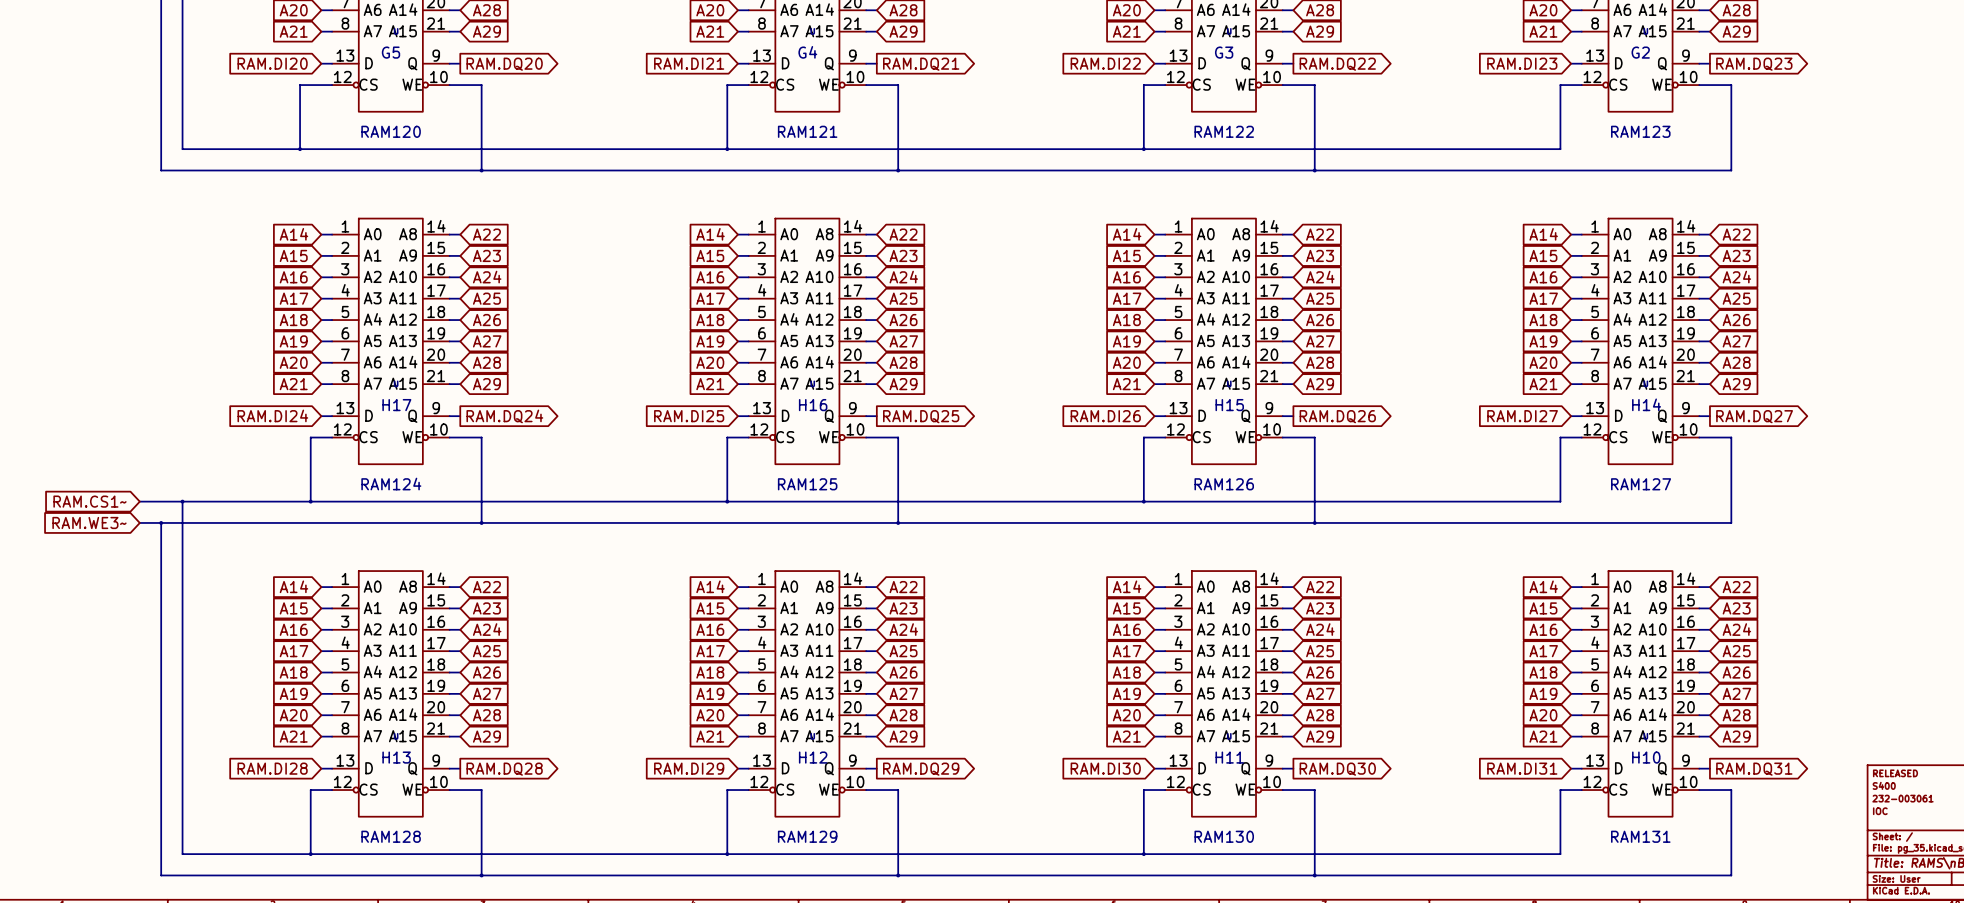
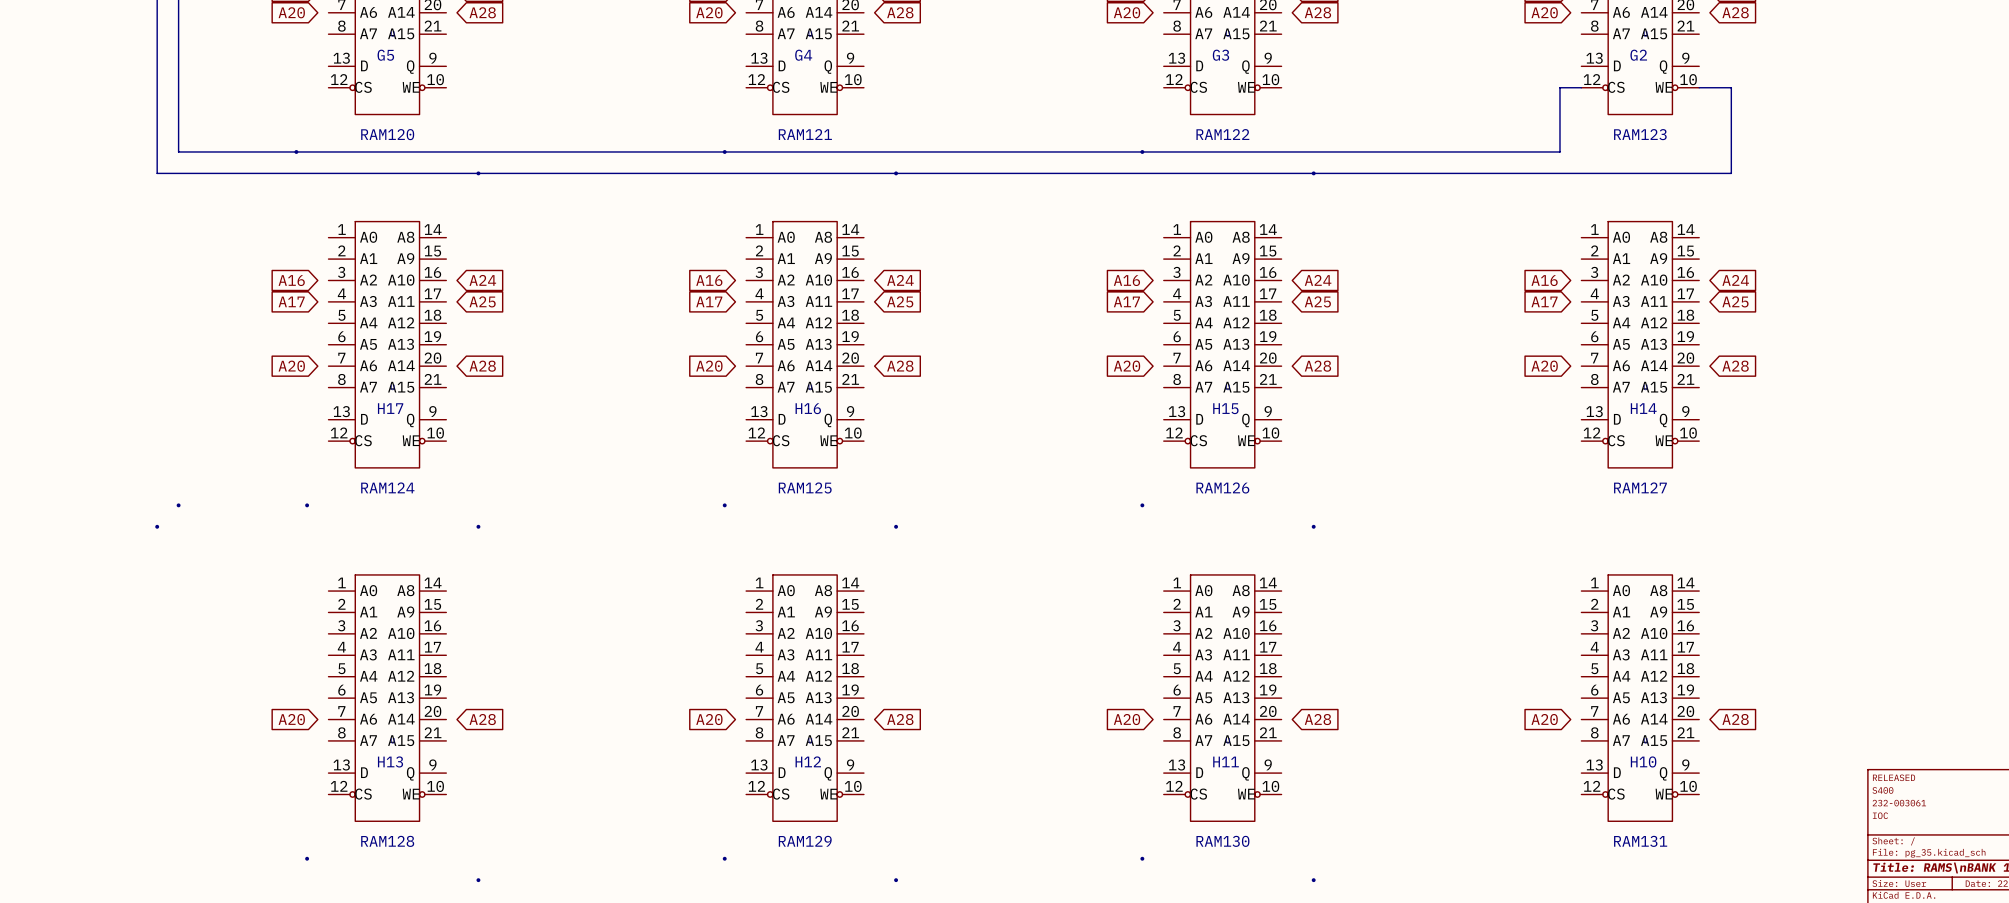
wire: (321, 10) (332, 10) -> none
wire: (449, 10) (460, 10) -> none
wire: (737, 10) (748, 10) -> none
wire: (866, 10) (876, 10) -> none
wire: (1154, 10) (1165, 10) -> none
wire: (1282, 10) (1293, 10) -> none
wire: (1571, 10) (1581, 10) -> none
wire: (1699, 10) (1709, 10) -> none
global label: A21 (293, 31) -> none
wire: (321, 31) (332, 31) -> none
wire: (449, 31) (460, 31) -> none
global label: A29 (486, 31) -> none
global label: A21 (710, 31) -> none
wire: (737, 31) (748, 31) -> none
wire: (866, 31) (876, 31) -> none
global label: A29 (903, 31) -> none
global label: A21 (1126, 31) -> none
wire: (1154, 31) (1165, 31) -> none
wire: (1282, 31) (1293, 31) -> none
global label: A29 (1320, 31) -> none
global label: A21 (1543, 31) -> none
wire: (1571, 31) (1581, 31) -> none
wire: (1699, 31) (1709, 31) -> none
global label: A29 (1736, 31) -> none
global label: RAM.DI20 (272, 63) -> none
wire: (321, 63) (332, 63) -> none
wire: (449, 63) (460, 63) -> none
global label: RAM.DI21 (689, 63) -> none
wire: (737, 63) (748, 63) -> none
wire: (866, 63) (876, 63) -> none
global label: RAM.DI22 (1105, 63) -> none
wire: (1154, 63) (1165, 63) -> none
wire: (1282, 63) (1293, 63) -> none
global label: RAM.DI23 (1522, 63) -> none
wire: (1571, 63) (1581, 63) -> none
wire: (1699, 63) (1709, 63) -> none
global label: RAM.DQ20 (504, 64) -> none
global label: RAM.DQ21 (921, 64) -> none
global label: RAM.DQ22 (1337, 64) -> none
global label: RAM.DQ23 (1754, 64) -> none
wire: (332, 85) (300, 85) (300, 149) -> none
wire: (449, 85) (481, 85) (481, 170) -> none
wire: (748, 85) (727, 85) (727, 149) -> none
wire: (866, 85) (898, 85) (898, 170) -> none
wire: (1165, 85) (1143, 85) (1143, 149) -> none
wire: (1282, 85) (1314, 85) (1314, 170) -> none
global label: A14 (293, 234) -> none
wire: (321, 234) (332, 234) -> none
wire: (449, 234) (460, 234) -> none
global label: A22 (486, 234) -> none
global label: A14 (710, 234) -> none
wire: (737, 234) (748, 234) -> none
wire: (866, 234) (876, 234) -> none
global label: A22 (903, 234) -> none
global label: A14 (1127, 234) -> none
wire: (1154, 234) (1165, 234) -> none
wire: (1282, 234) (1293, 234) -> none
global label: A22 (1320, 234) -> none
global label: A14 (1543, 234) -> none
wire: (1571, 234) (1581, 234) -> none
wire: (1699, 234) (1709, 234) -> none
global label: A22 (1736, 234) -> none
global label: A15 (293, 255) -> none
wire: (321, 255) (332, 255) -> none
wire: (449, 255) (460, 255) -> none
global label: A23 (486, 255) -> none
global label: A15 (710, 255) -> none
wire: (737, 255) (748, 255) -> none
wire: (866, 255) (876, 255) -> none
global label: A23 (903, 255) -> none
global label: A15 (1126, 255) -> none
wire: (1154, 255) (1165, 255) -> none
wire: (1282, 255) (1293, 255) -> none
global label: A23 (1320, 255) -> none
global label: A15 (1543, 255) -> none
wire: (1571, 255) (1581, 255) -> none
wire: (1699, 255) (1709, 255) -> none
global label: A23 (1736, 255) -> none
wire: (321, 277) (332, 277) -> none
wire: (449, 277) (460, 277) -> none
wire: (737, 277) (748, 277) -> none
wire: (866, 277) (876, 277) -> none
wire: (1154, 277) (1165, 277) -> none
wire: (1282, 277) (1293, 277) -> none
wire: (1571, 277) (1581, 277) -> none
wire: (1699, 277) (1709, 277) -> none
wire: (321, 298) (332, 298) -> none
wire: (449, 298) (460, 298) -> none
wire: (737, 298) (748, 298) -> none
wire: (866, 298) (876, 298) -> none
wire: (1154, 298) (1165, 298) -> none
wire: (1282, 298) (1293, 298) -> none
wire: (1571, 298) (1581, 298) -> none
wire: (1699, 298) (1709, 298) -> none
global label: A18 (293, 320) -> none
wire: (321, 320) (332, 320) -> none
wire: (449, 320) (460, 320) -> none
global label: A26 (486, 320) -> none
global label: A18 (710, 320) -> none
wire: (737, 320) (748, 320) -> none
wire: (866, 320) (876, 320) -> none
global label: A26 (903, 320) -> none
global label: A18 (1126, 320) -> none
wire: (1154, 320) (1165, 320) -> none
wire: (1282, 320) (1293, 320) -> none
global label: A26 (1320, 320) -> none
global label: A18 (1543, 320) -> none
wire: (1571, 320) (1581, 320) -> none
wire: (1699, 320) (1709, 320) -> none
global label: A26 (1736, 320) -> none
global label: A19 (293, 341) -> none
wire: (321, 341) (332, 341) -> none
wire: (449, 341) (460, 341) -> none
global label: A27 (487, 341) -> none
global label: A19 (710, 341) -> none
wire: (737, 341) (748, 341) -> none
wire: (866, 341) (876, 341) -> none
global label: A27 (903, 341) -> none
global label: A19 (1126, 341) -> none
wire: (1154, 341) (1165, 341) -> none
wire: (1282, 341) (1293, 341) -> none
global label: A27 (1320, 341) -> none
global label: A19 (1543, 341) -> none
wire: (1571, 341) (1581, 341) -> none
wire: (1699, 341) (1709, 341) -> none
global label: A27 (1736, 341) -> none
wire: (321, 362) (332, 362) -> none
wire: (449, 362) (460, 362) -> none
wire: (737, 362) (748, 362) -> none
wire: (866, 362) (876, 362) -> none
wire: (1154, 362) (1165, 362) -> none
wire: (1282, 362) (1293, 362) -> none
wire: (1571, 362) (1581, 362) -> none
wire: (1699, 362) (1709, 362) -> none
global label: A21 (293, 384) -> none
wire: (321, 384) (332, 384) -> none
wire: (449, 384) (460, 384) -> none
global label: A29 (486, 384) -> none
global label: A21 (710, 384) -> none
wire: (737, 384) (748, 384) -> none
wire: (866, 384) (876, 384) -> none
global label: A29 (903, 384) -> none
global label: A21 (1126, 384) -> none
wire: (1154, 384) (1165, 384) -> none
wire: (1282, 384) (1293, 384) -> none
global label: A29 (1320, 384) -> none
global label: A21 (1543, 384) -> none
wire: (1571, 384) (1581, 384) -> none
wire: (1699, 384) (1709, 384) -> none
global label: A29 (1736, 384) -> none
global label: RAM.DI24 (272, 415) -> none
wire: (321, 416) (332, 416) -> none
wire: (449, 416) (460, 416) -> none
global label: RAM.DQ24 (504, 416) -> none
global label: RAM.DI25 (689, 416) -> none
wire: (737, 416) (748, 416) -> none
wire: (866, 416) (876, 416) -> none
global label: RAM.DQ25 (921, 416) -> none
global label: RAM.DI26 (1105, 416) -> none
wire: (1154, 416) (1165, 416) -> none
wire: (1282, 416) (1293, 416) -> none
global label: RAM.DQ26 (1337, 416) -> none
global label: RAM.DI27 (1522, 416) -> none
wire: (1571, 416) (1581, 416) -> none
wire: (1699, 416) (1709, 416) -> none
global label: RAM.DQ27 (1754, 416) -> none
wire: (332, 437) (310, 437) (310, 501) -> none
wire: (449, 437) (481, 437) (481, 522) -> none
wire: (748, 437) (727, 437) (727, 501) -> none
wire: (866, 437) (898, 437) (898, 522) -> none
wire: (1165, 437) (1143, 437) (1143, 501) -> none
wire: (1282, 437) (1314, 437) (1314, 522) -> none
wire: (1581, 437) (1560, 437) (1560, 501) (139, 501) -> none
wire: (1699, 437) (1731, 437) (1731, 522) (139, 522) -> none
global label: RAM.CS1~ (89, 501) -> none
wire: (182, 501) (182, 854) (1560, 854) (1560, 790) (1581, 790) -> none
global label: RAM.WE3~ (89, 522) -> none
wire: (161, 522) (161, 875) (1731, 875) (1731, 790) (1699, 790) -> none
global label: A14 (293, 586) -> none
global label: A14 (710, 586) -> none
global label: A14 (1127, 586) -> none
global label: A14 (1543, 586) -> none
wire: (321, 587) (332, 587) -> none
wire: (449, 587) (460, 587) -> none
global label: A22 (486, 587) -> none
wire: (737, 587) (748, 587) -> none
wire: (866, 587) (876, 587) -> none
global label: A22 (903, 587) -> none
wire: (1154, 587) (1165, 587) -> none
wire: (1282, 587) (1293, 587) -> none
global label: A22 (1320, 587) -> none
wire: (1571, 587) (1581, 587) -> none
wire: (1699, 587) (1709, 587) -> none
global label: A22 (1736, 587) -> none
global label: A15 (293, 608) -> none
wire: (321, 608) (332, 608) -> none
wire: (449, 608) (460, 608) -> none
global label: A23 (486, 608) -> none
global label: A15 (710, 608) -> none
wire: (737, 608) (748, 608) -> none
wire: (866, 608) (876, 608) -> none
global label: A23 (903, 608) -> none
global label: A15 (1126, 608) -> none
wire: (1154, 608) (1165, 608) -> none
wire: (1282, 608) (1293, 608) -> none
global label: A23 (1320, 608) -> none
global label: A15 (1543, 608) -> none
wire: (1571, 608) (1581, 608) -> none
wire: (1699, 608) (1709, 608) -> none
global label: A23 (1736, 608) -> none
global label: A16 (293, 629) -> none
wire: (321, 629) (332, 629) -> none
wire: (449, 629) (460, 629) -> none
global label: A24 (487, 629) -> none
global label: A16 (710, 629) -> none
wire: (737, 629) (748, 629) -> none
wire: (866, 629) (876, 629) -> none
global label: A24 (903, 629) -> none
global label: A16 (1126, 629) -> none
wire: (1154, 629) (1165, 629) -> none
wire: (1282, 629) (1293, 629) -> none
global label: A24 (1320, 629) -> none
global label: A16 (1543, 629) -> none
wire: (1571, 629) (1581, 629) -> none
wire: (1699, 629) (1709, 629) -> none
global label: A24 (1736, 629) -> none
global label: A17 (293, 651) -> none
wire: (321, 651) (332, 651) -> none
wire: (449, 651) (460, 651) -> none
global label: A25 (486, 651) -> none
global label: A17 (710, 651) -> none
wire: (737, 651) (748, 651) -> none
wire: (866, 651) (876, 651) -> none
global label: A25 (903, 651) -> none
global label: A17 (1127, 651) -> none
wire: (1154, 651) (1165, 651) -> none
wire: (1282, 651) (1293, 651) -> none
global label: A25 (1320, 651) -> none
global label: A17 (1543, 651) -> none
wire: (1571, 651) (1581, 651) -> none
wire: (1699, 651) (1709, 651) -> none
global label: A25 (1736, 651) -> none
global label: A18 (293, 672) -> none
wire: (321, 672) (332, 672) -> none
wire: (449, 672) (460, 672) -> none
global label: A26 (486, 672) -> none
global label: A18 (710, 672) -> none
wire: (737, 672) (748, 672) -> none
wire: (866, 672) (876, 672) -> none
global label: A26 (903, 672) -> none
global label: A18 (1126, 672) -> none
wire: (1154, 672) (1165, 672) -> none
wire: (1282, 672) (1293, 672) -> none
global label: A26 (1320, 672) -> none
global label: A18 (1543, 672) -> none
wire: (1571, 672) (1581, 672) -> none
wire: (1699, 672) (1709, 672) -> none
global label: A26 (1736, 672) -> none
global label: A19 (293, 693) -> none
wire: (321, 693) (332, 693) -> none
wire: (449, 693) (460, 693) -> none
global label: A27 (487, 693) -> none
global label: A19 (710, 693) -> none
wire: (737, 693) (748, 693) -> none
wire: (866, 693) (876, 693) -> none
global label: A27 (903, 693) -> none
global label: A19 (1126, 693) -> none
wire: (1154, 693) (1165, 693) -> none
wire: (1282, 693) (1293, 693) -> none
global label: A27 (1320, 693) -> none
global label: A19 (1543, 693) -> none
wire: (1571, 693) (1581, 693) -> none
wire: (1699, 693) (1709, 693) -> none
global label: A27 (1736, 693) -> none
wire: (321, 715) (332, 715) -> none
wire: (449, 715) (460, 715) -> none
wire: (737, 715) (748, 715) -> none
wire: (866, 715) (876, 715) -> none
wire: (1154, 715) (1165, 715) -> none
wire: (1282, 715) (1293, 715) -> none
wire: (1571, 715) (1581, 715) -> none
wire: (1699, 715) (1709, 715) -> none
global label: A21 (293, 736) -> none
wire: (321, 736) (332, 736) -> none
wire: (449, 736) (460, 736) -> none
global label: A29 (486, 736) -> none
global label: A21 (710, 736) -> none
wire: (737, 736) (748, 736) -> none
wire: (866, 736) (876, 736) -> none
global label: A29 (903, 736) -> none
global label: A21 (1126, 736) -> none
wire: (1154, 736) (1165, 736) -> none
wire: (1282, 736) (1293, 736) -> none
global label: A29 (1320, 736) -> none
global label: A21 (1543, 736) -> none
wire: (1571, 736) (1581, 736) -> none
wire: (1699, 736) (1709, 736) -> none
global label: A29 (1736, 736) -> none
global label: RAM.DI28 (272, 768) -> none
wire: (321, 768) (332, 768) -> none
wire: (449, 768) (460, 768) -> none
global label: RAM.DI29 (689, 768) -> none
wire: (737, 768) (748, 768) -> none
wire: (866, 768) (876, 768) -> none
global label: RAM.DI30 (1105, 768) -> none
wire: (1154, 768) (1165, 768) -> none
wire: (1282, 768) (1293, 768) -> none
global label: RAM.DI31 (1522, 768) -> none
wire: (1571, 768) (1581, 768) -> none
wire: (1699, 768) (1709, 768) -> none
global label: RAM.DQ28 (504, 769) -> none
global label: RAM.DQ29 (921, 769) -> none
global label: RAM.DQ30 (1337, 769) -> none
global label: RAM.DQ31 (1754, 769) -> none
wire: (332, 790) (310, 790) (310, 854) -> none
wire: (449, 790) (481, 790) (481, 875) -> none
wire: (748, 790) (727, 790) (727, 854) -> none
wire: (866, 790) (898, 790) (898, 875) -> none
wire: (1165, 790) (1143, 790) (1143, 854) -> none
wire: (1282, 790) (1314, 790) (1314, 875) -> none

